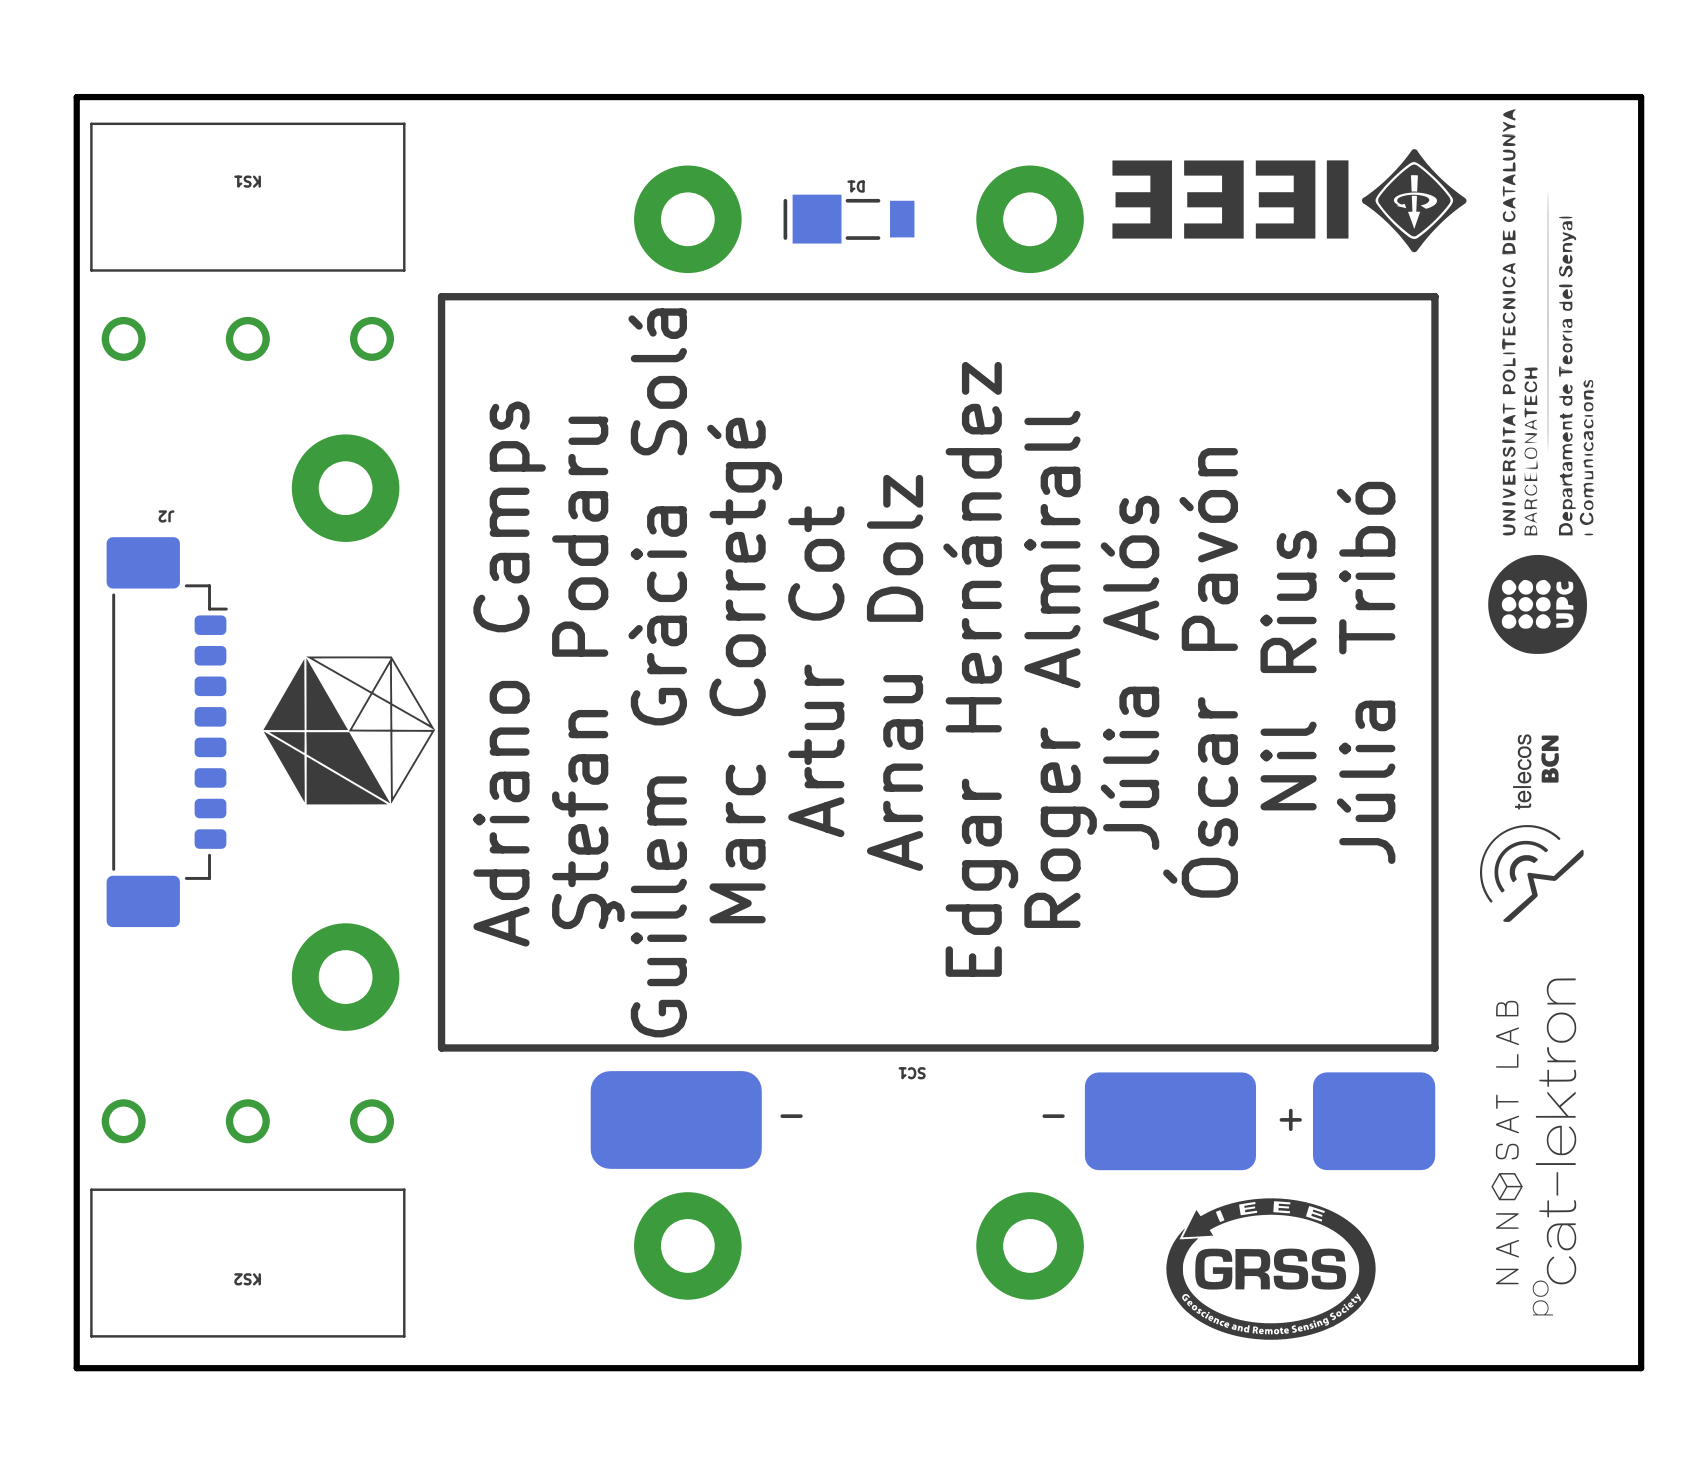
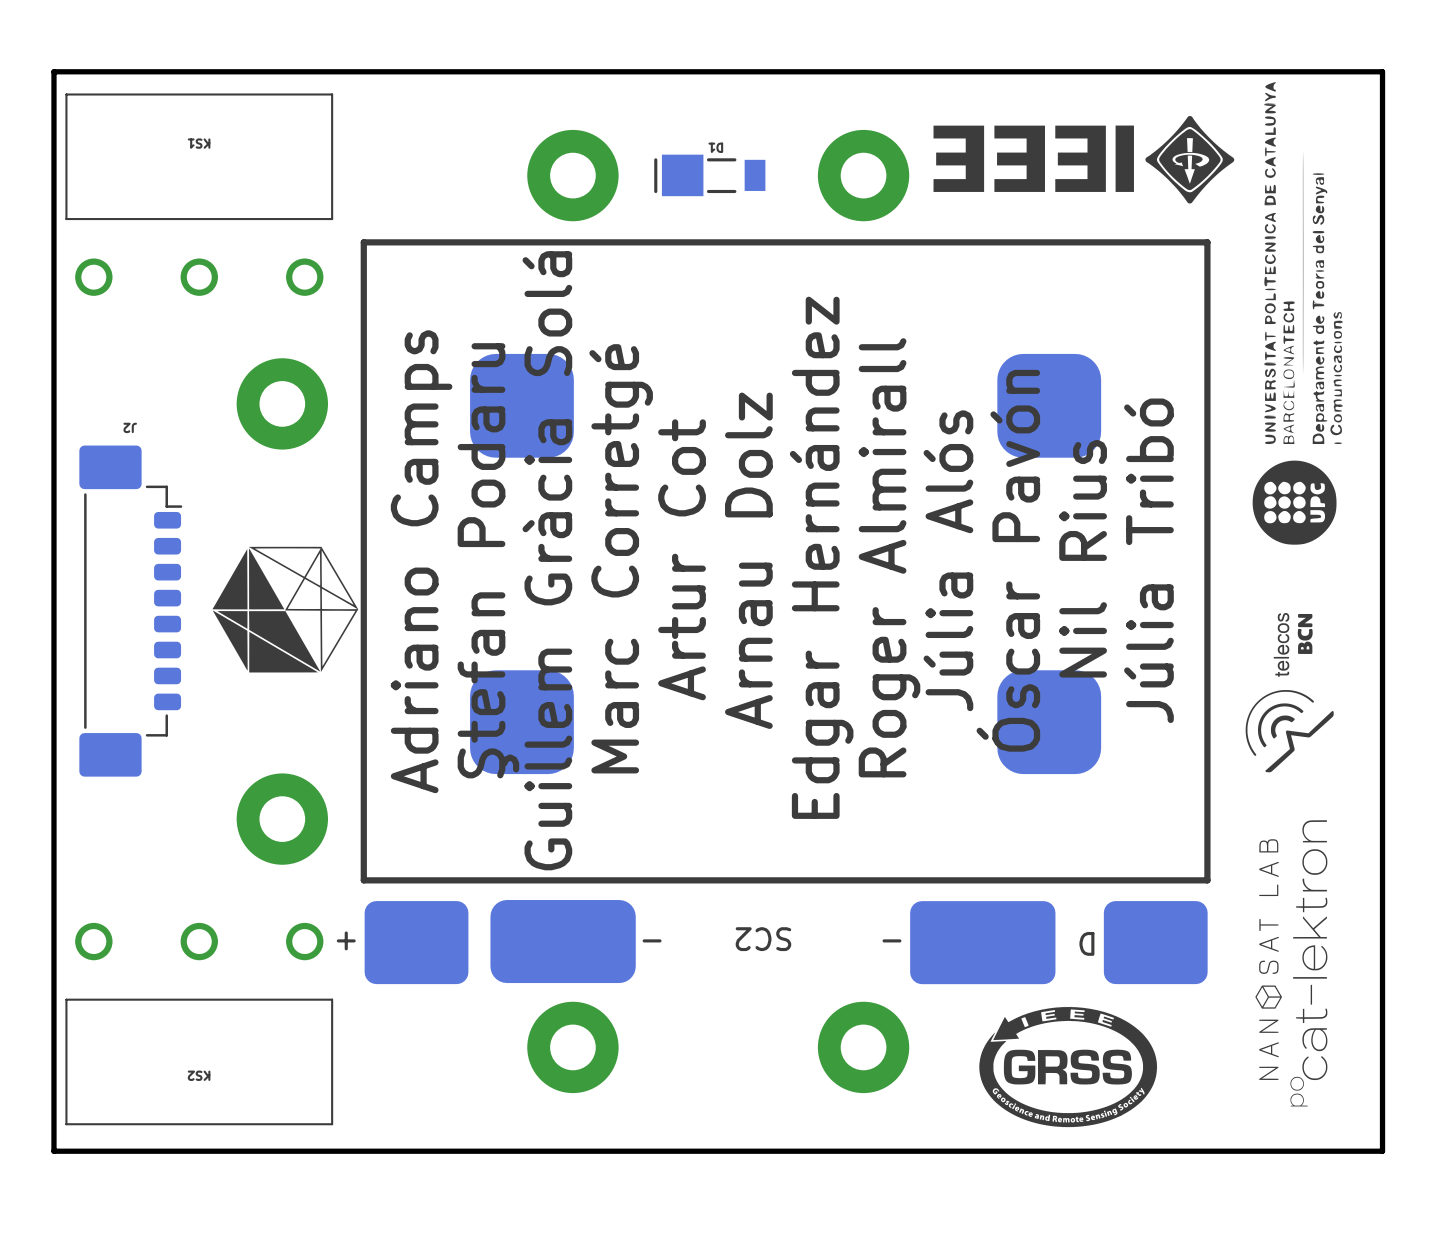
SC1: (938, 731) -> none
SC2: none -> (785, 611)

